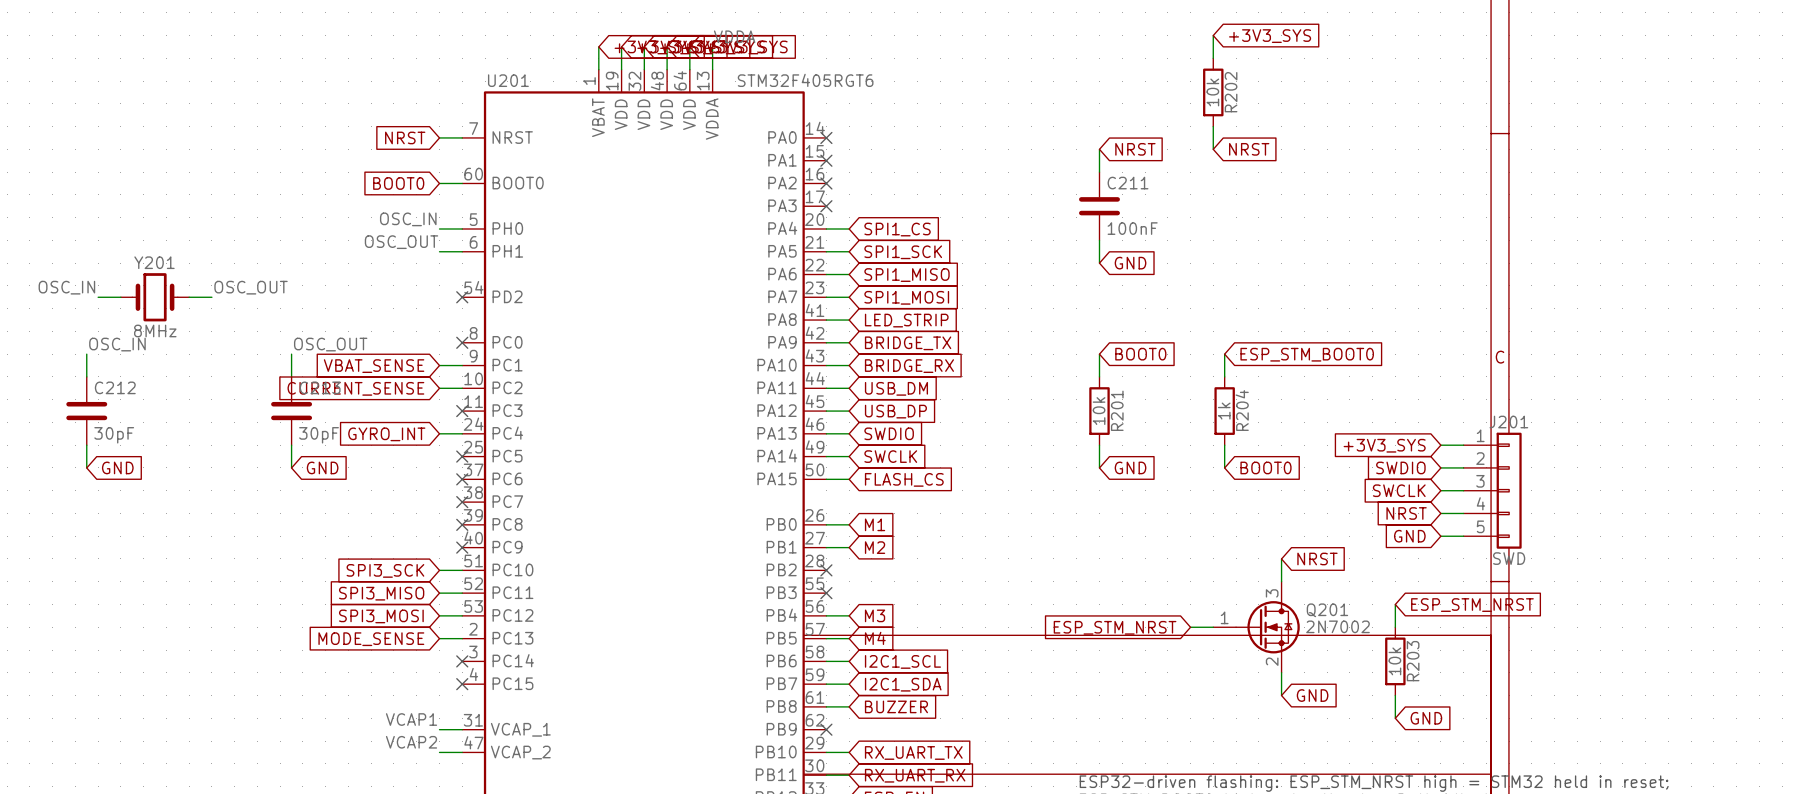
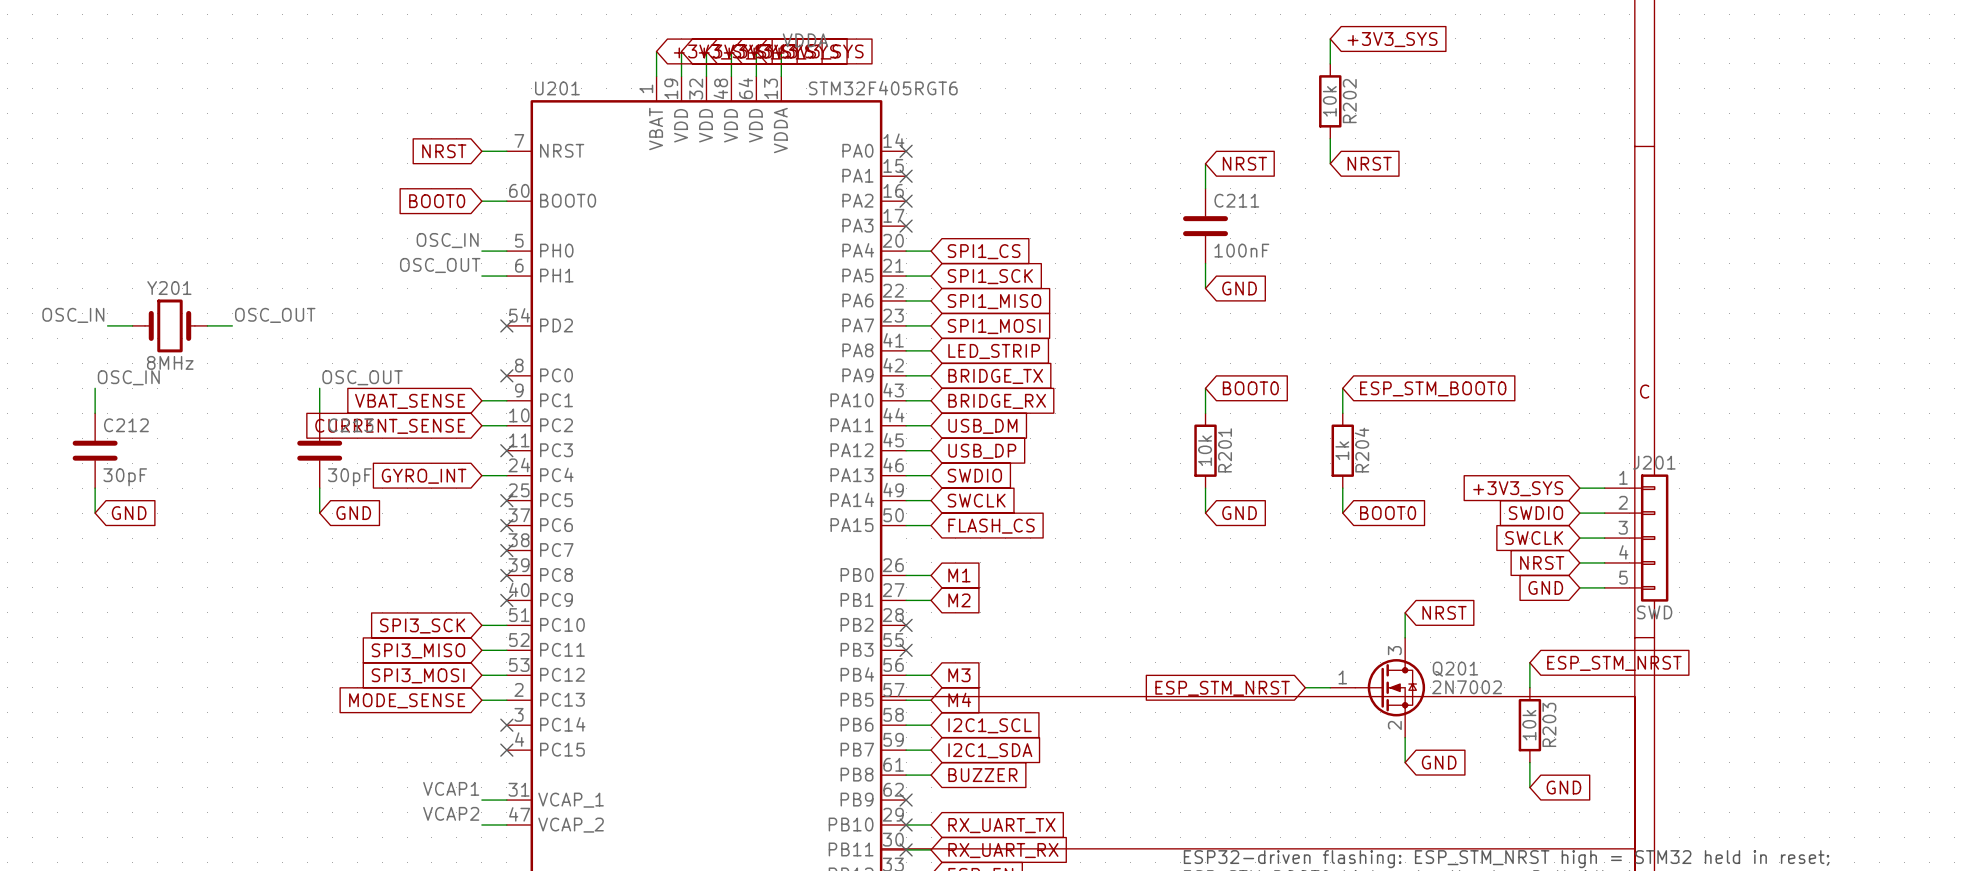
no-connect mark: none -> (906, 824)
no-connect mark: none -> (906, 849)

